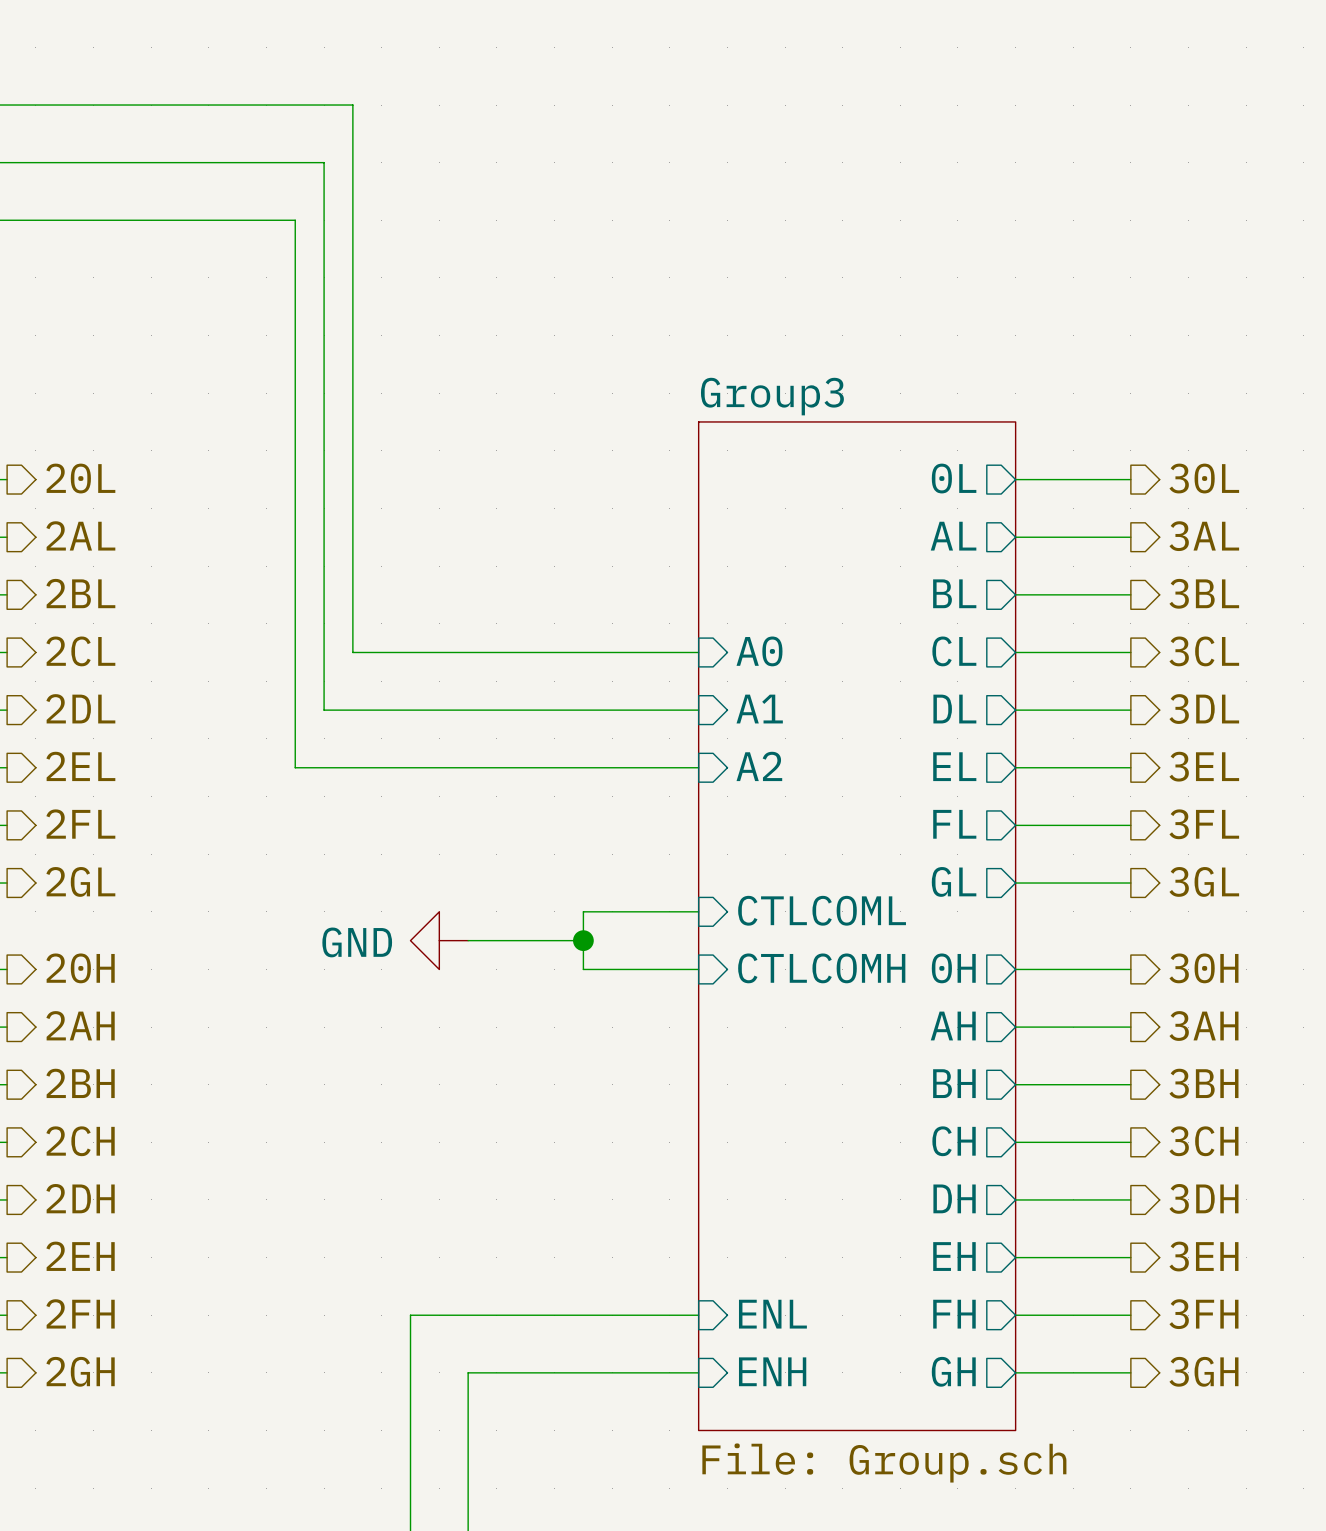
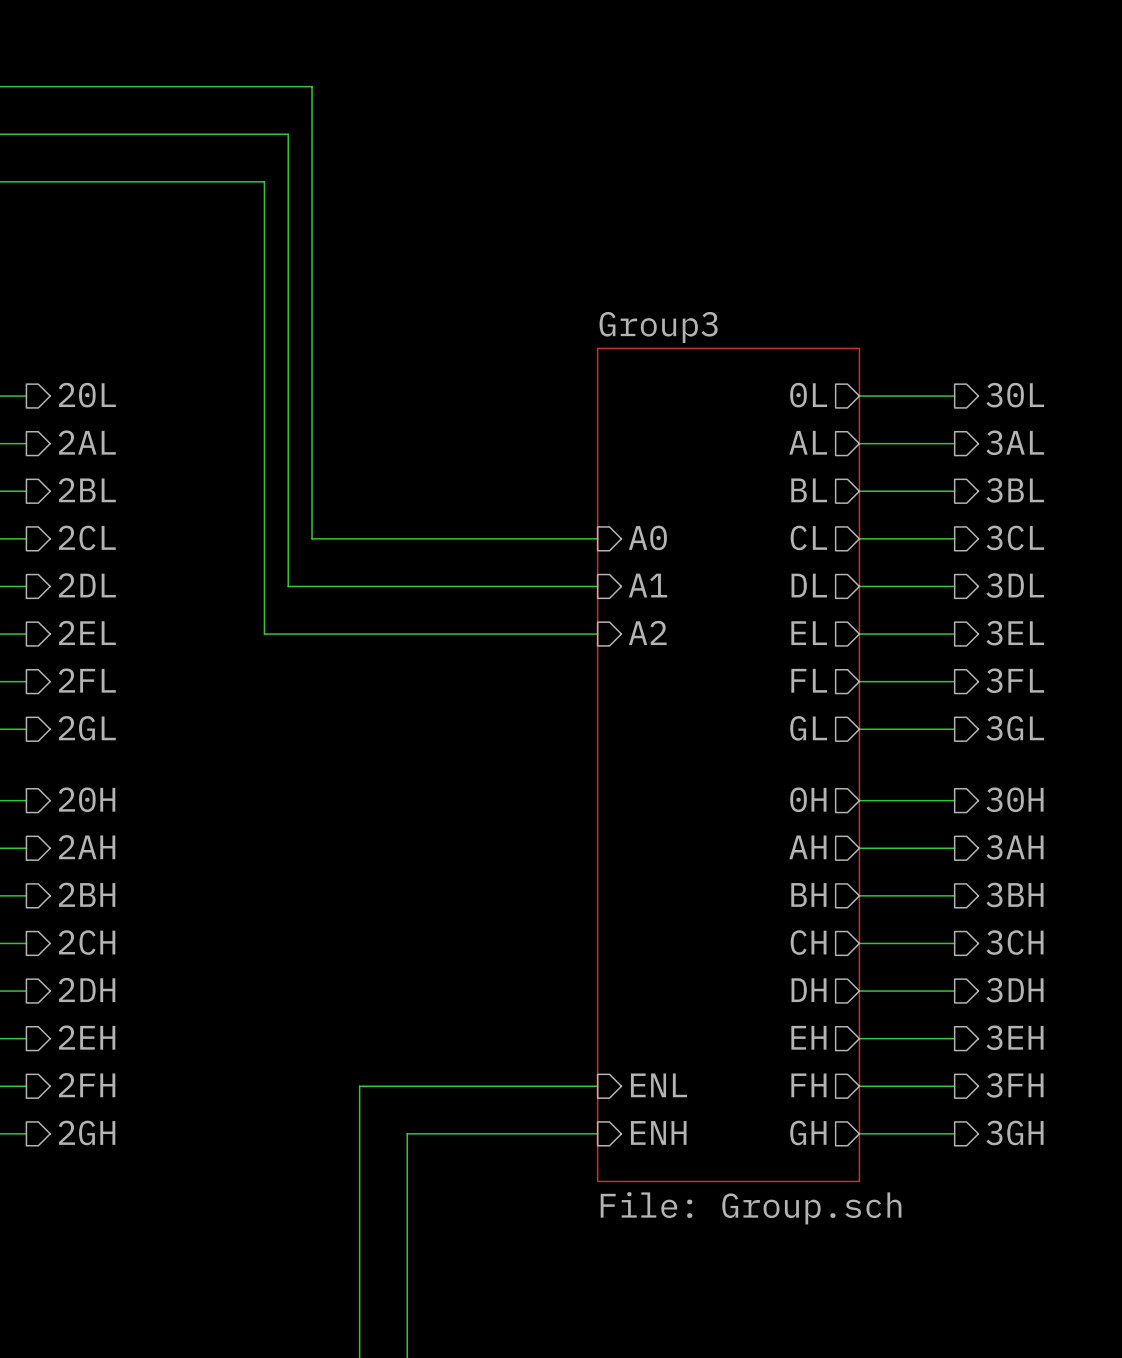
sheet pin: CTLCOML (822, 910) -> none
wire: (698, 911) (583, 911) (583, 969) (698, 969) -> none
power symbol: GND (439, 940) -> none
wire: (468, 940) (583, 940) -> none
junction: (583, 940) -> none
sheet pin: CTLCOMH (821, 968) -> none

